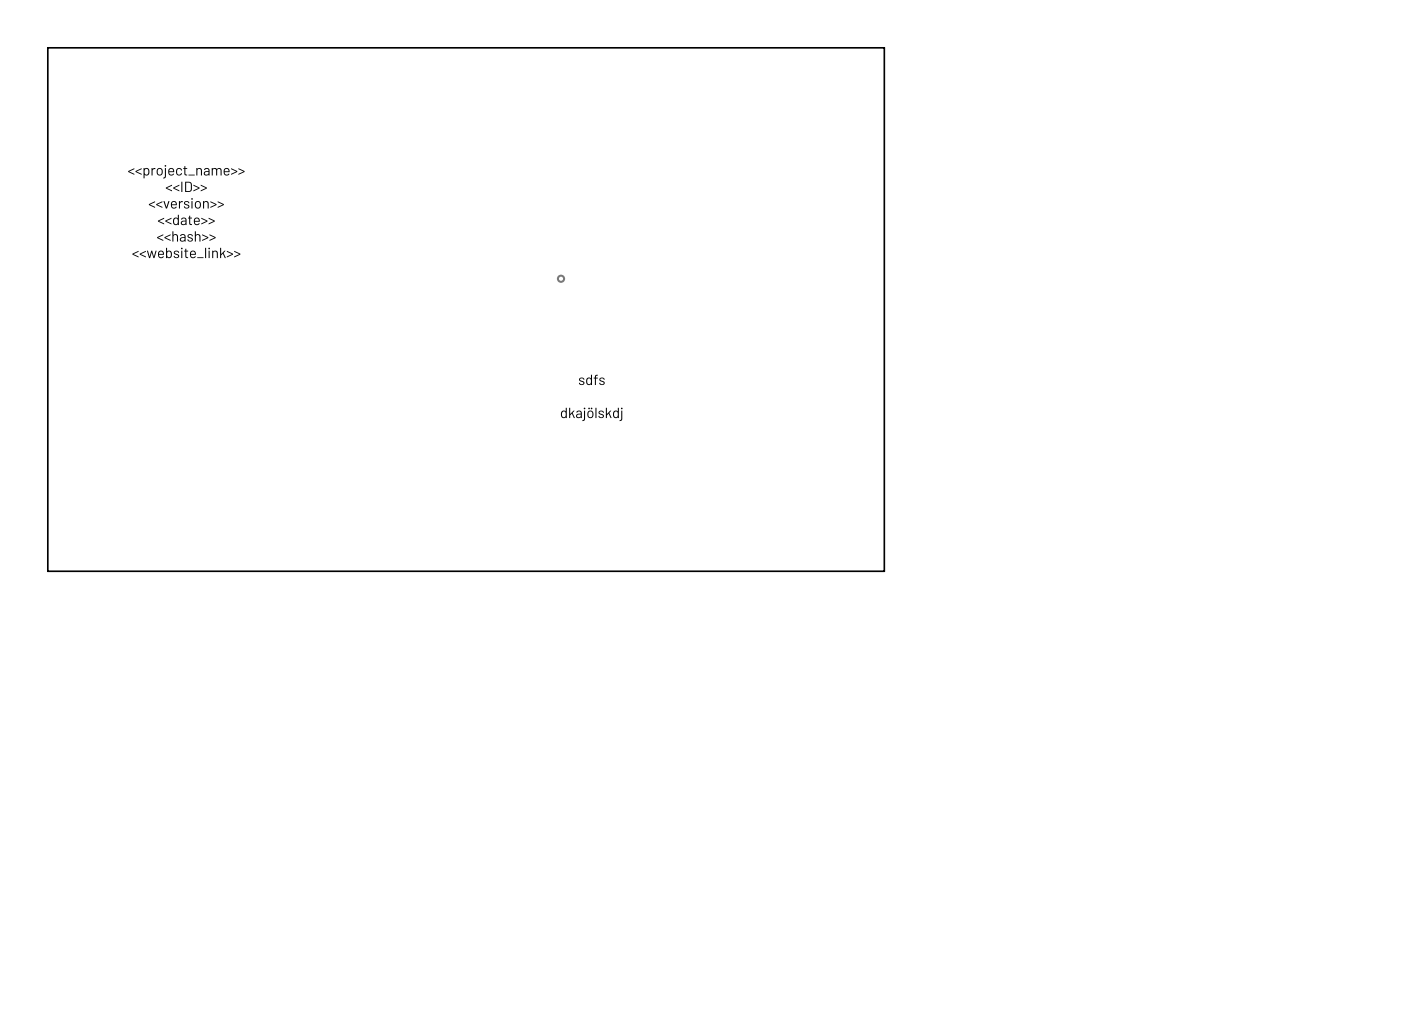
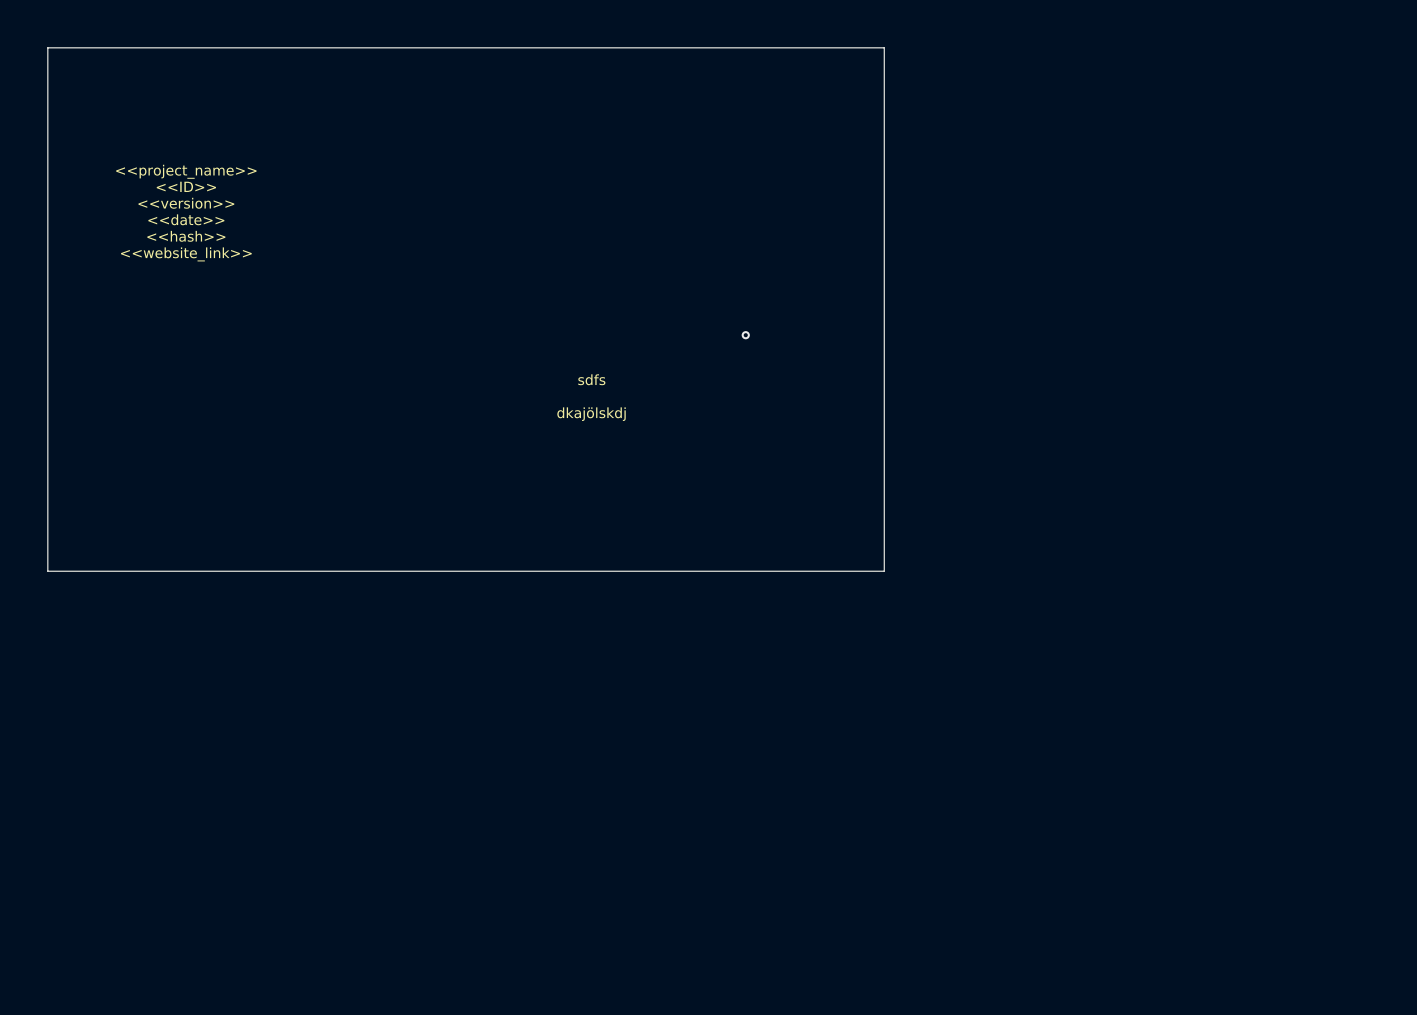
via: (561, 278) -> none
via: none -> (745, 335)

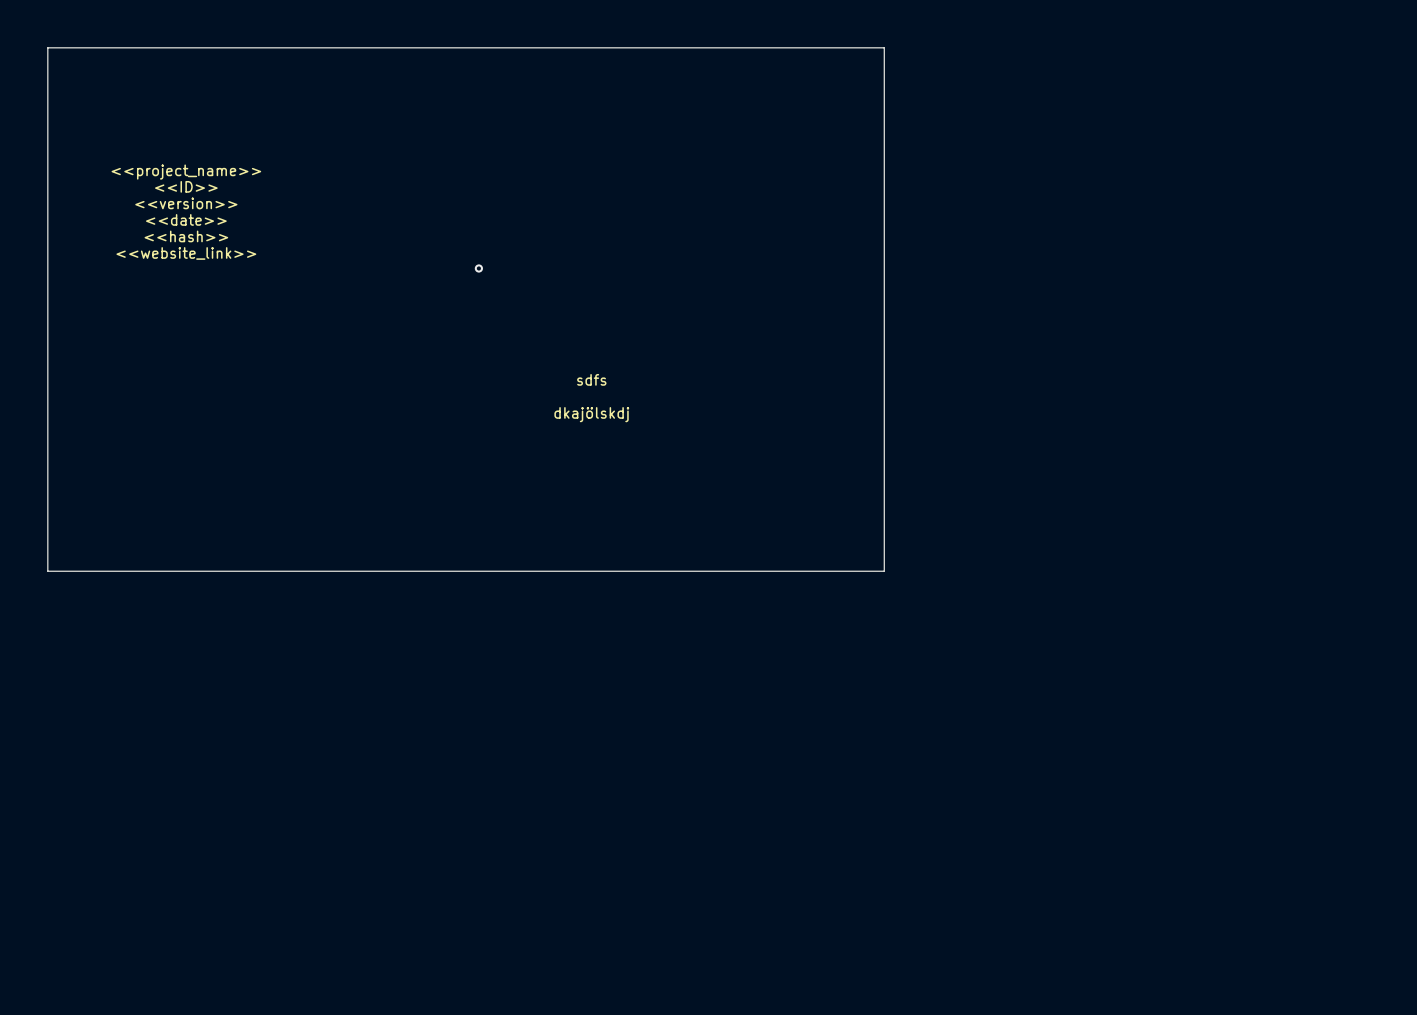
via: none -> (478, 268)
via: (745, 335) -> none

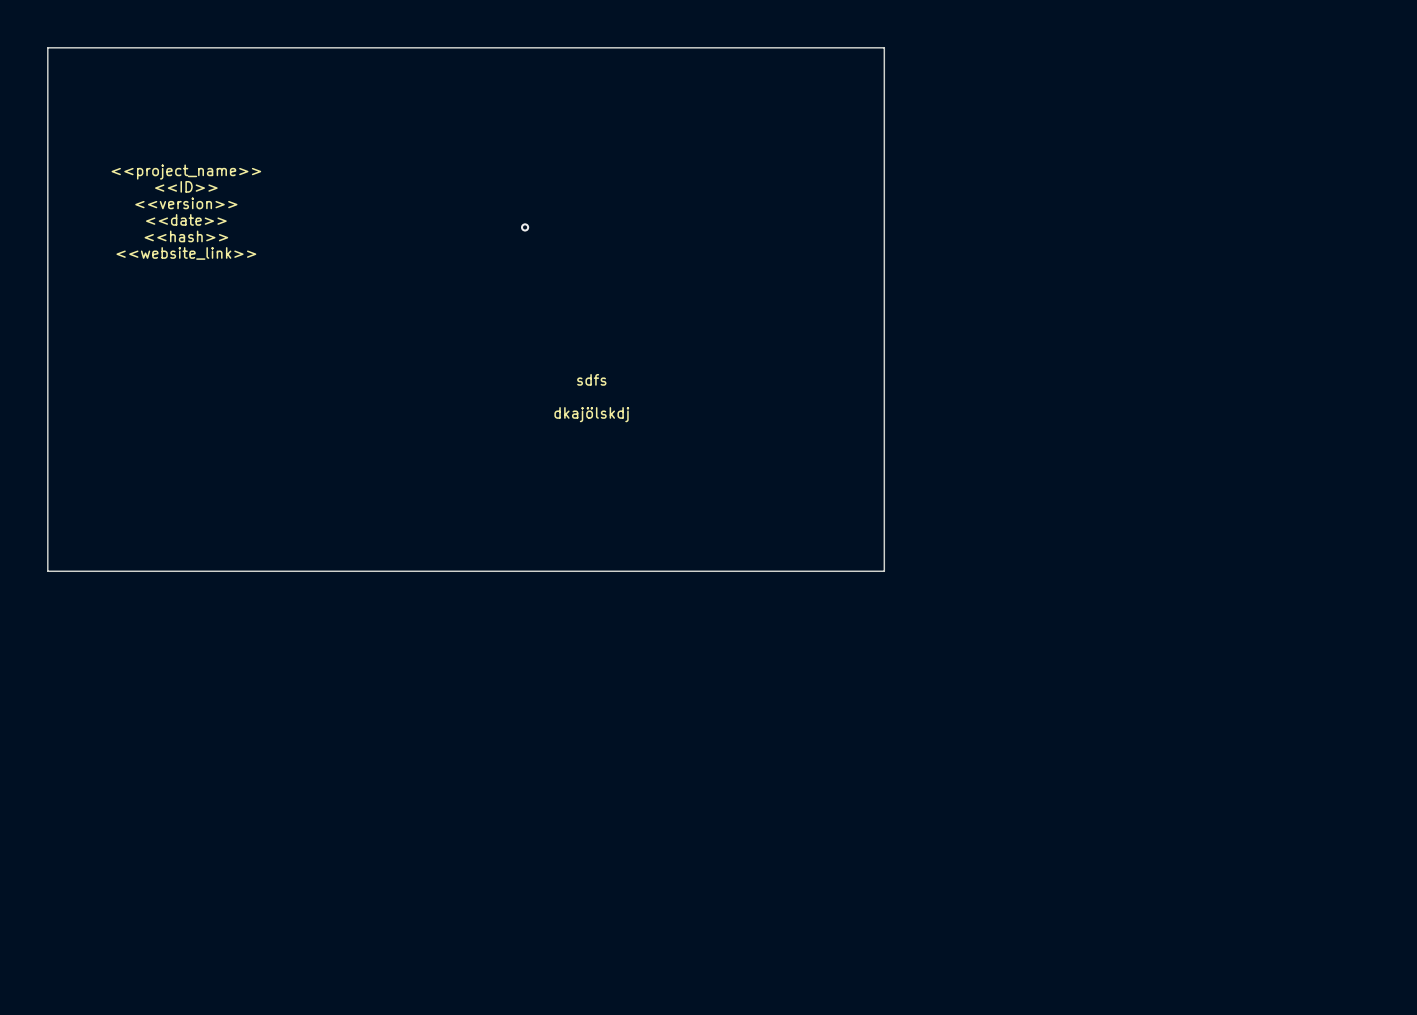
via: none -> (525, 227)
via: (478, 268) -> none

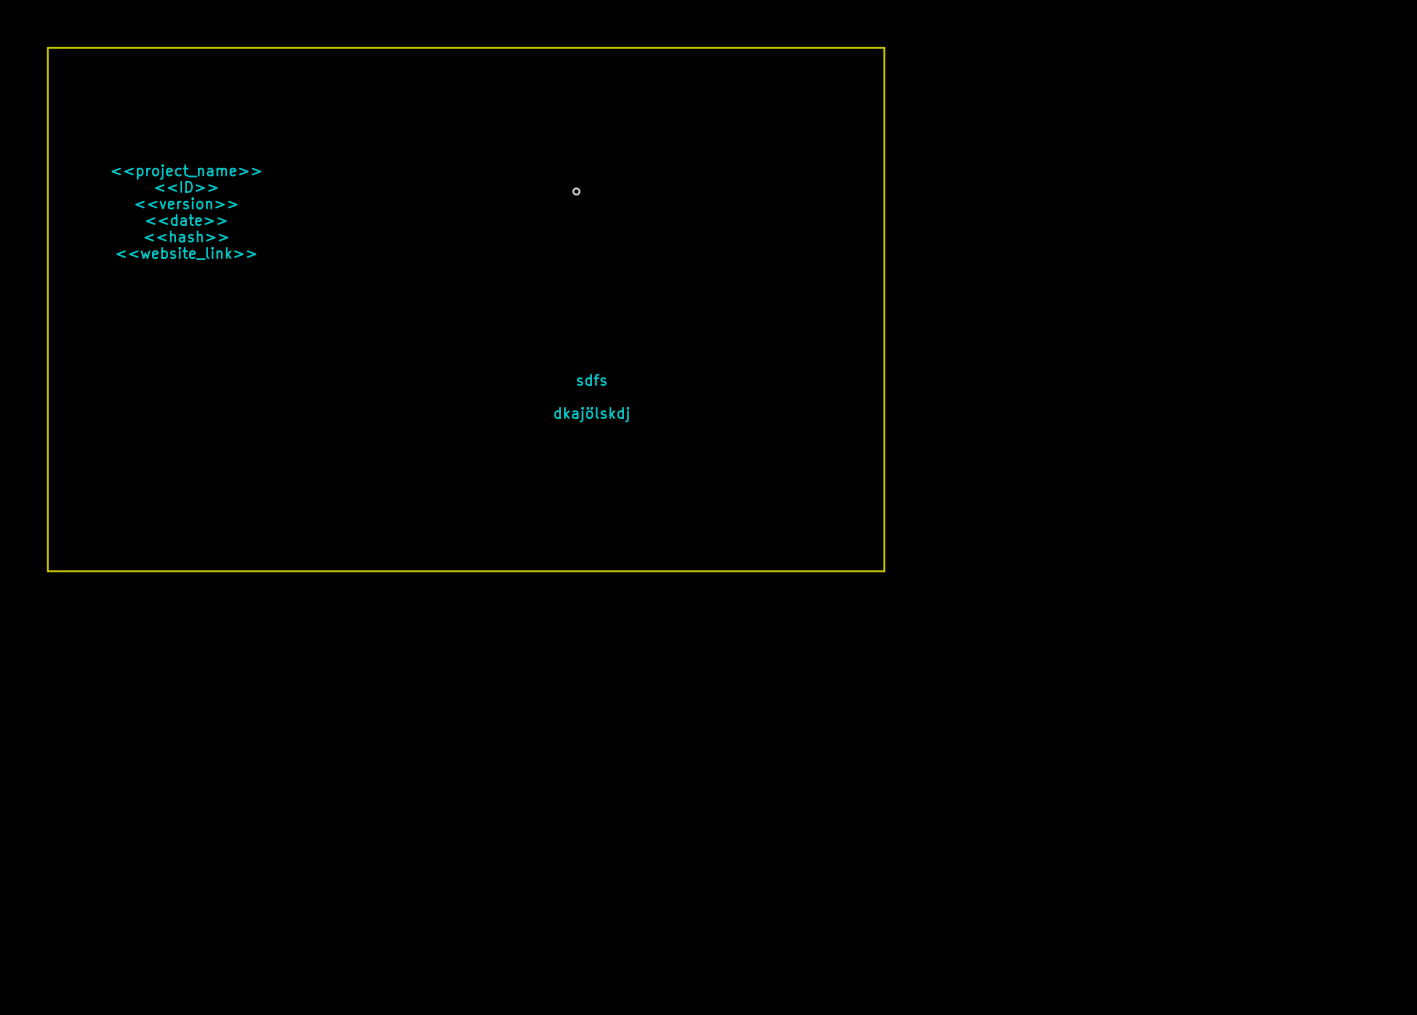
via: none -> (576, 191)
via: (525, 227) -> none

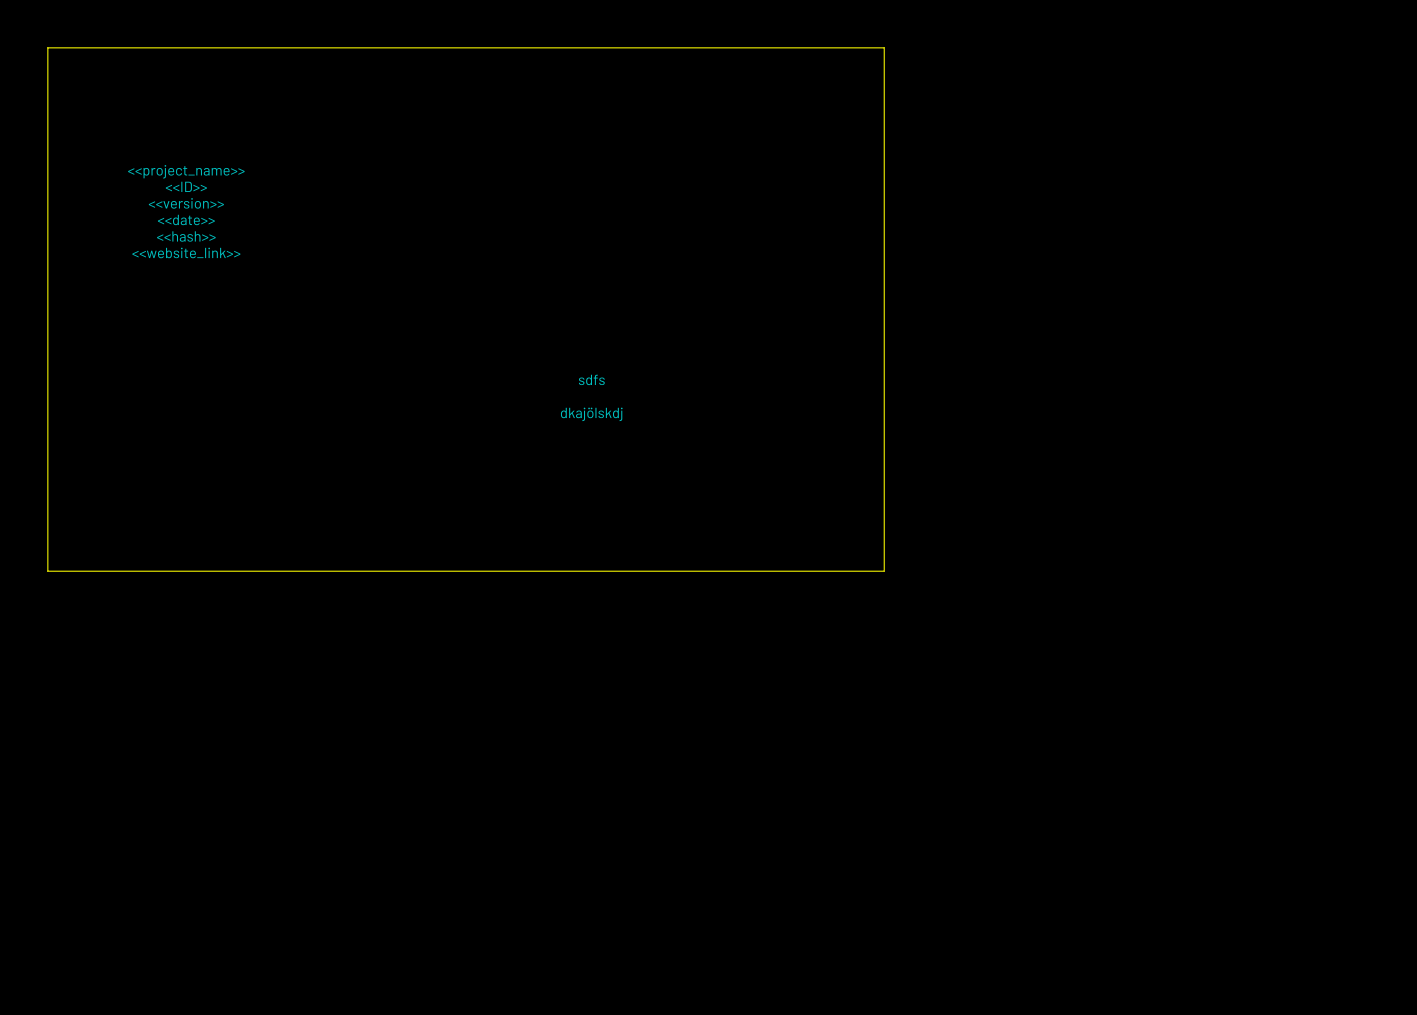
via: (576, 191) -> none

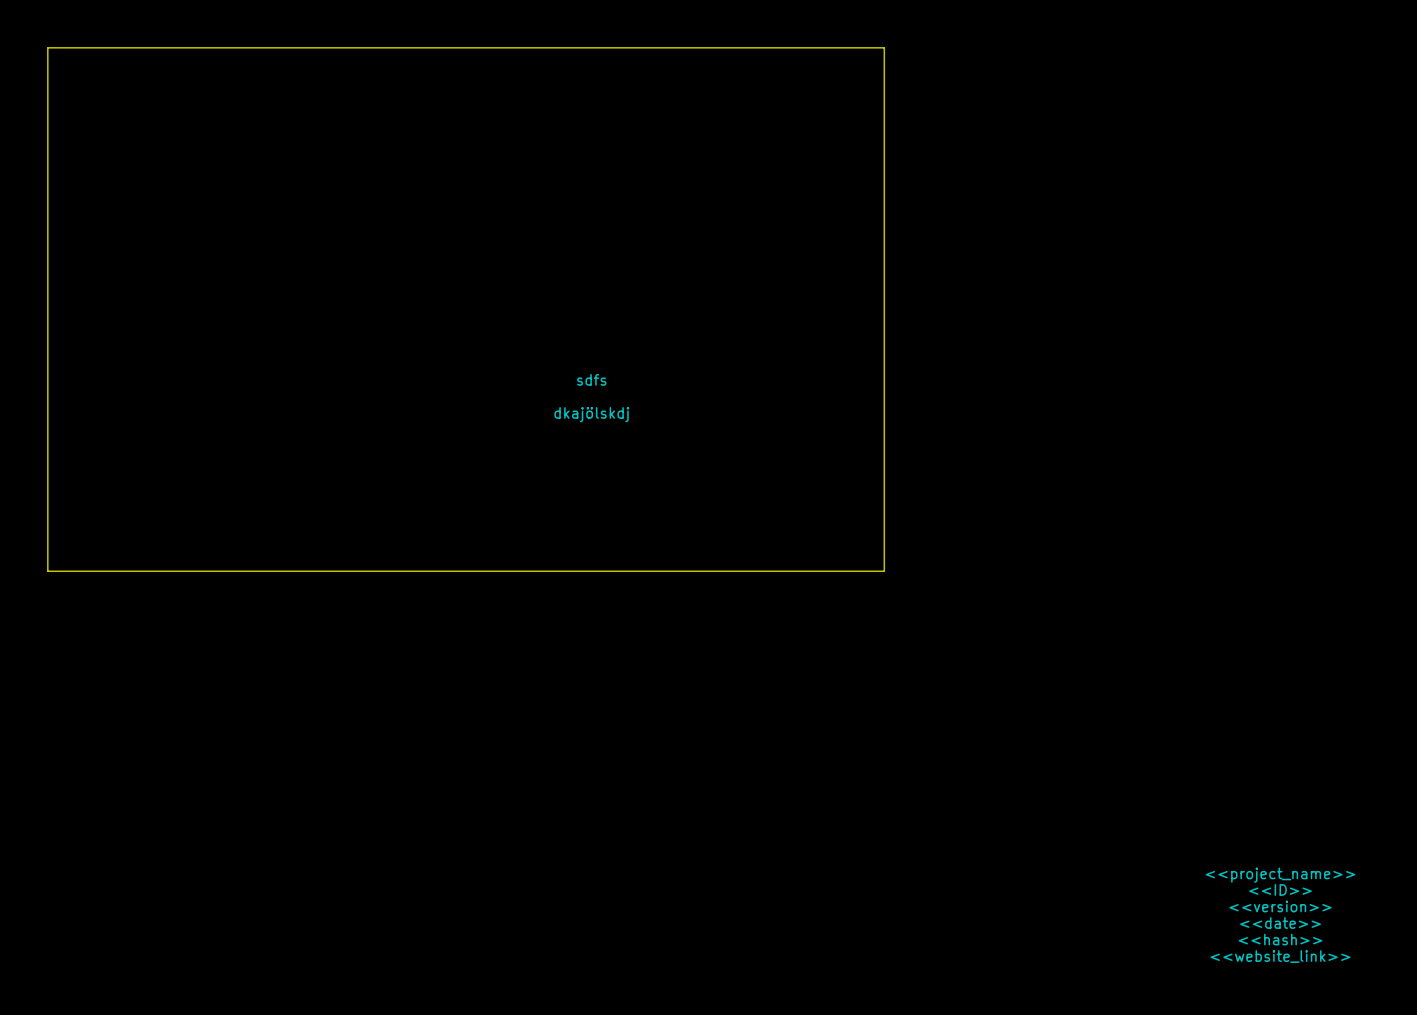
text: <<project_name>> (186, 171) -> none
text: <<ID>> (186, 186) -> none
text: <<version>> (186, 203) -> none
text: <<date>> (186, 219) -> none
text: <<hash>> (186, 236) -> none
text: <<website_link>> (186, 252) -> none
text: none -> <<project_name>> (1280, 875)
text: none -> <<ID>> (1280, 889)
text: none -> <<version>> (1280, 906)
text: none -> <<date>> (1280, 922)
text: none -> <<hash>> (1280, 939)
text: none -> <<website_link>> (1280, 956)

